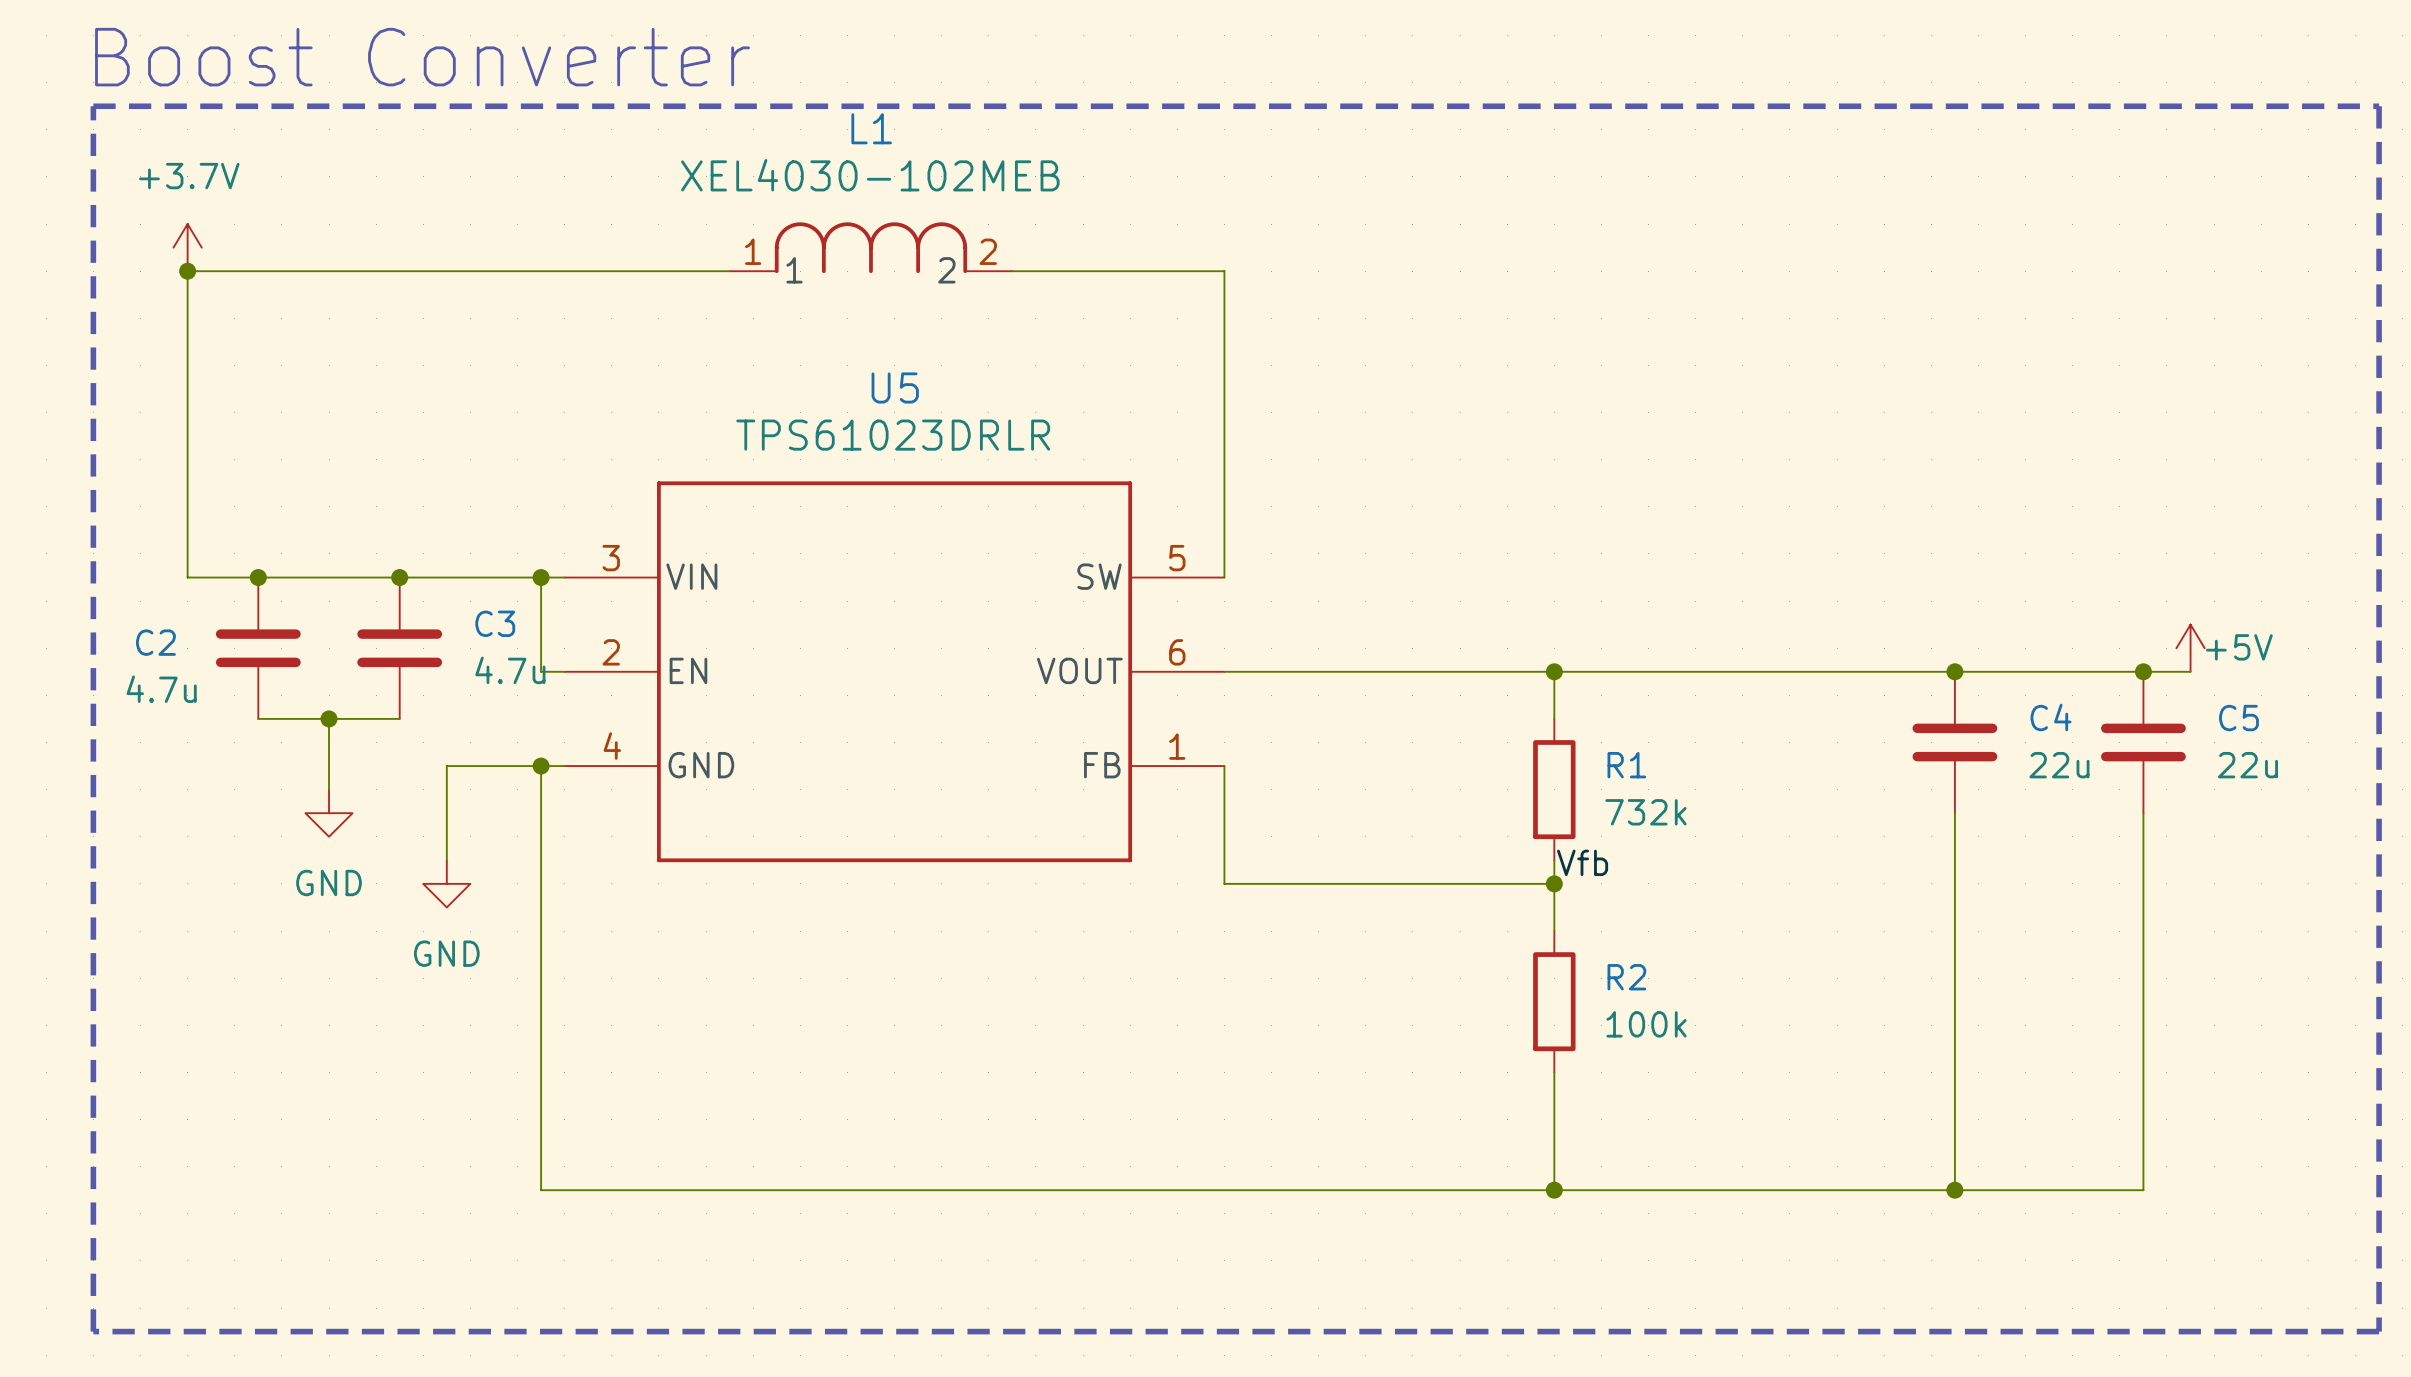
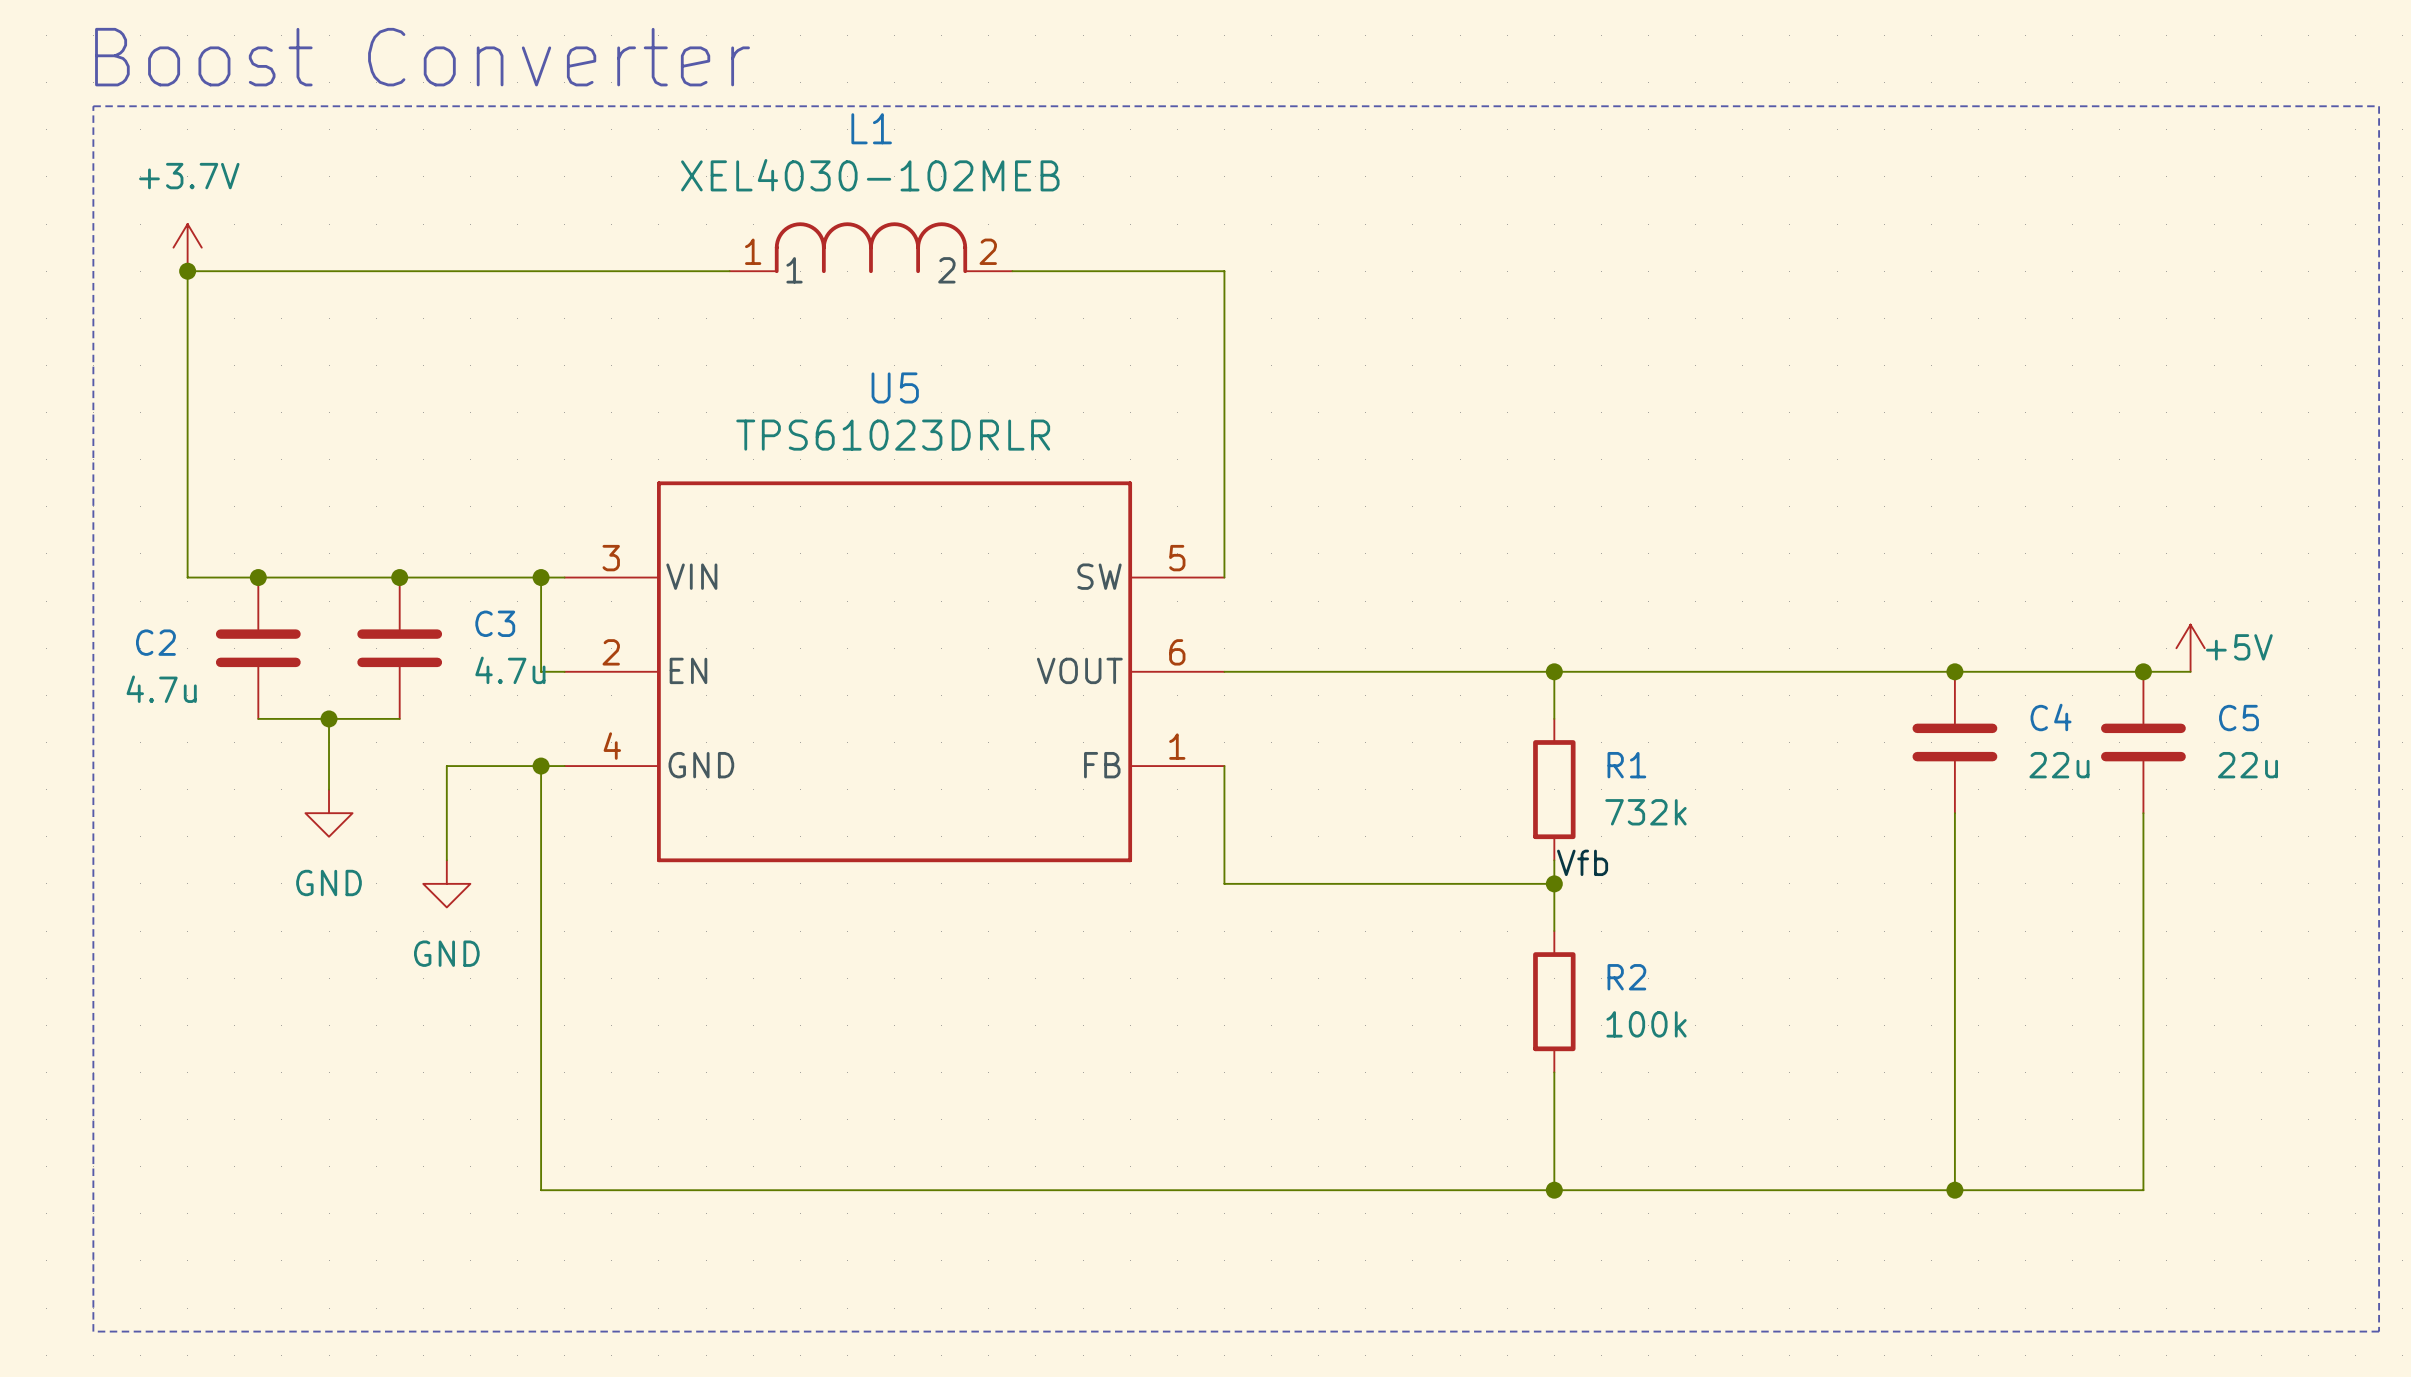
line width: thick (93, 106) (2379, 106) (2379, 1331) (93, 1331) (93, 106) -> thin (93, 106) (2379, 106) (2379, 1331) (93, 1331) (93, 106)

